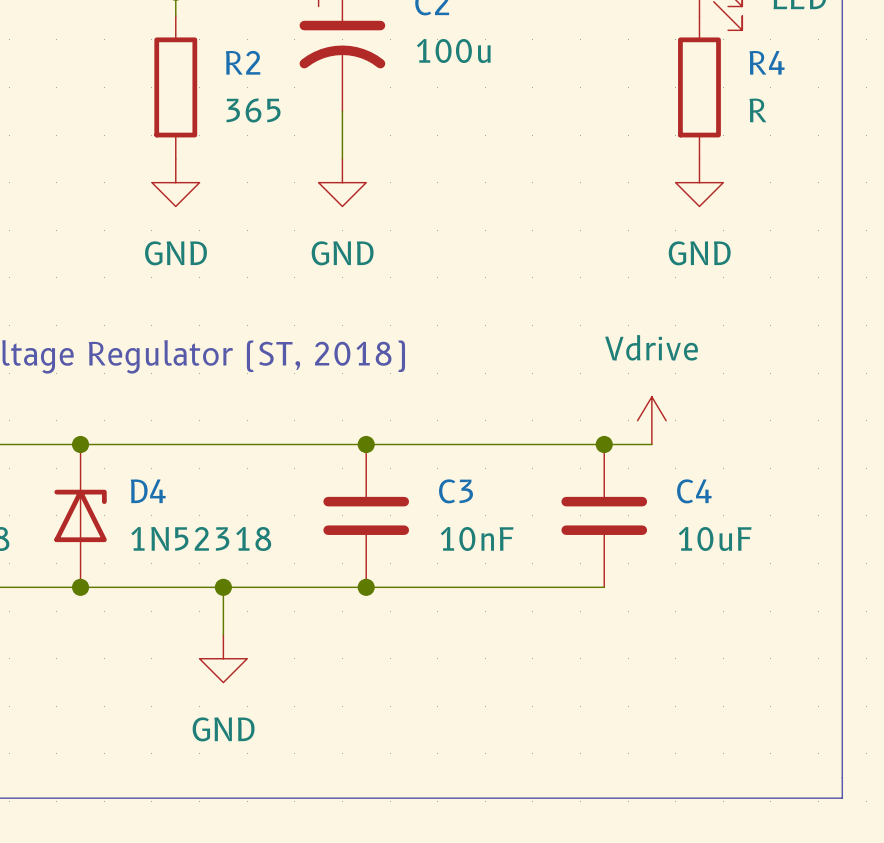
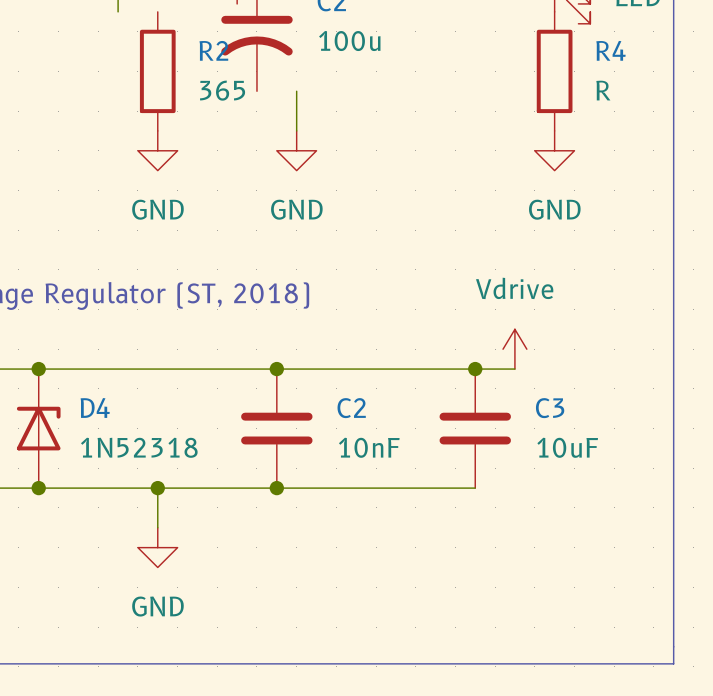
R2 position: (175, 87) -> (157, 71)
wire: (342, 111) (342, 158) -> (296, 91) (296, 130)
power symbol position: GND (175, 182) -> GND (157, 150)
power symbol position: GND (342, 182) -> GND (296, 150)
C3 name: C3 (456, 491) -> C2 (351, 408)
C4 name: C4 (694, 491) -> C3 (550, 408)

